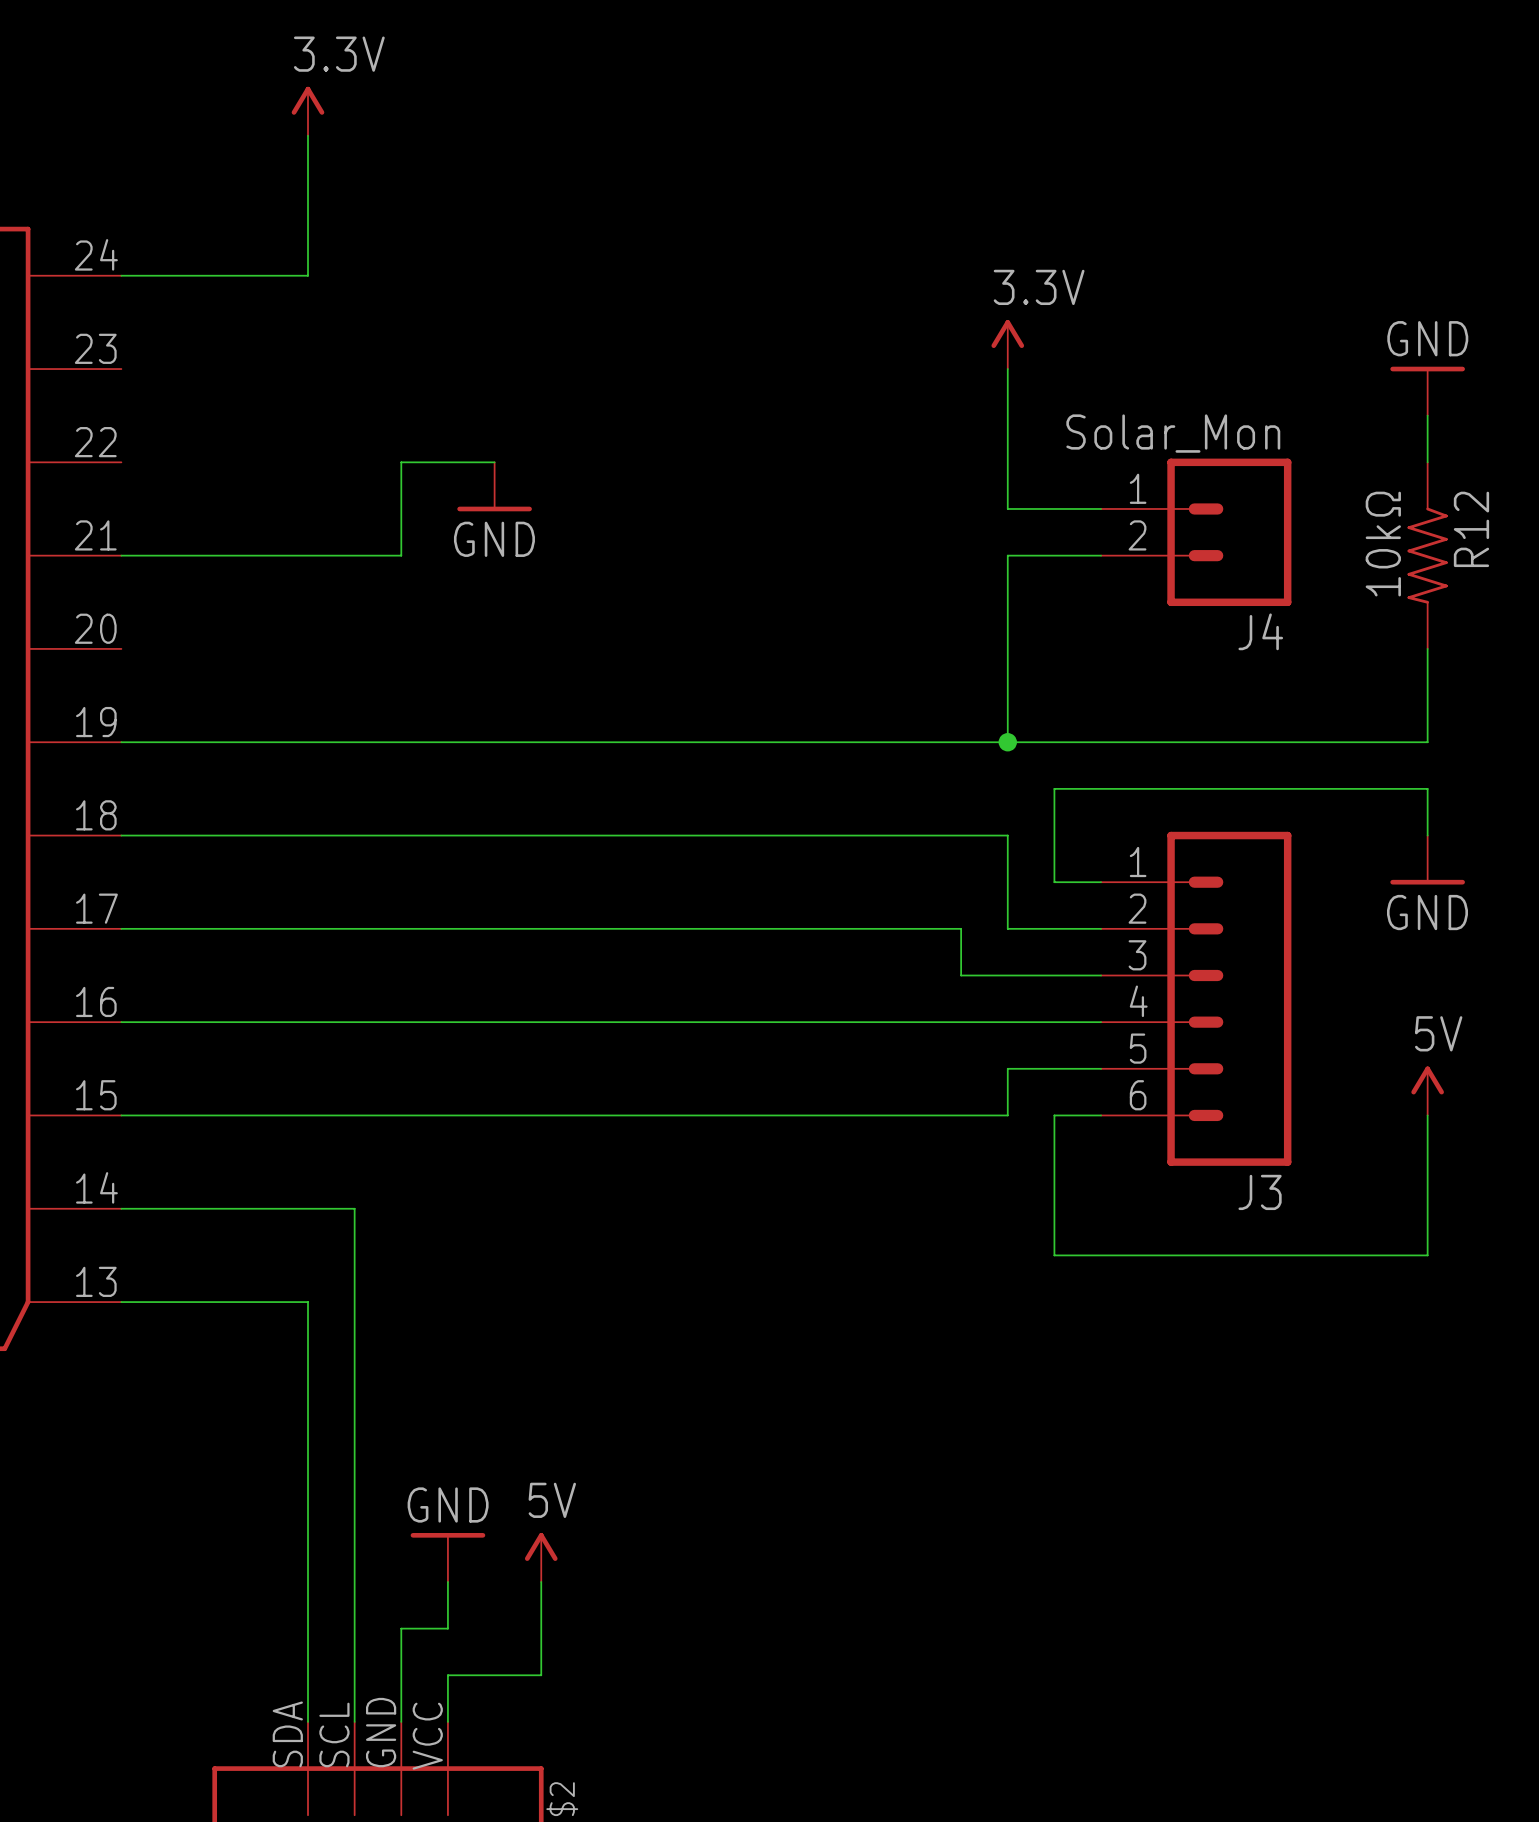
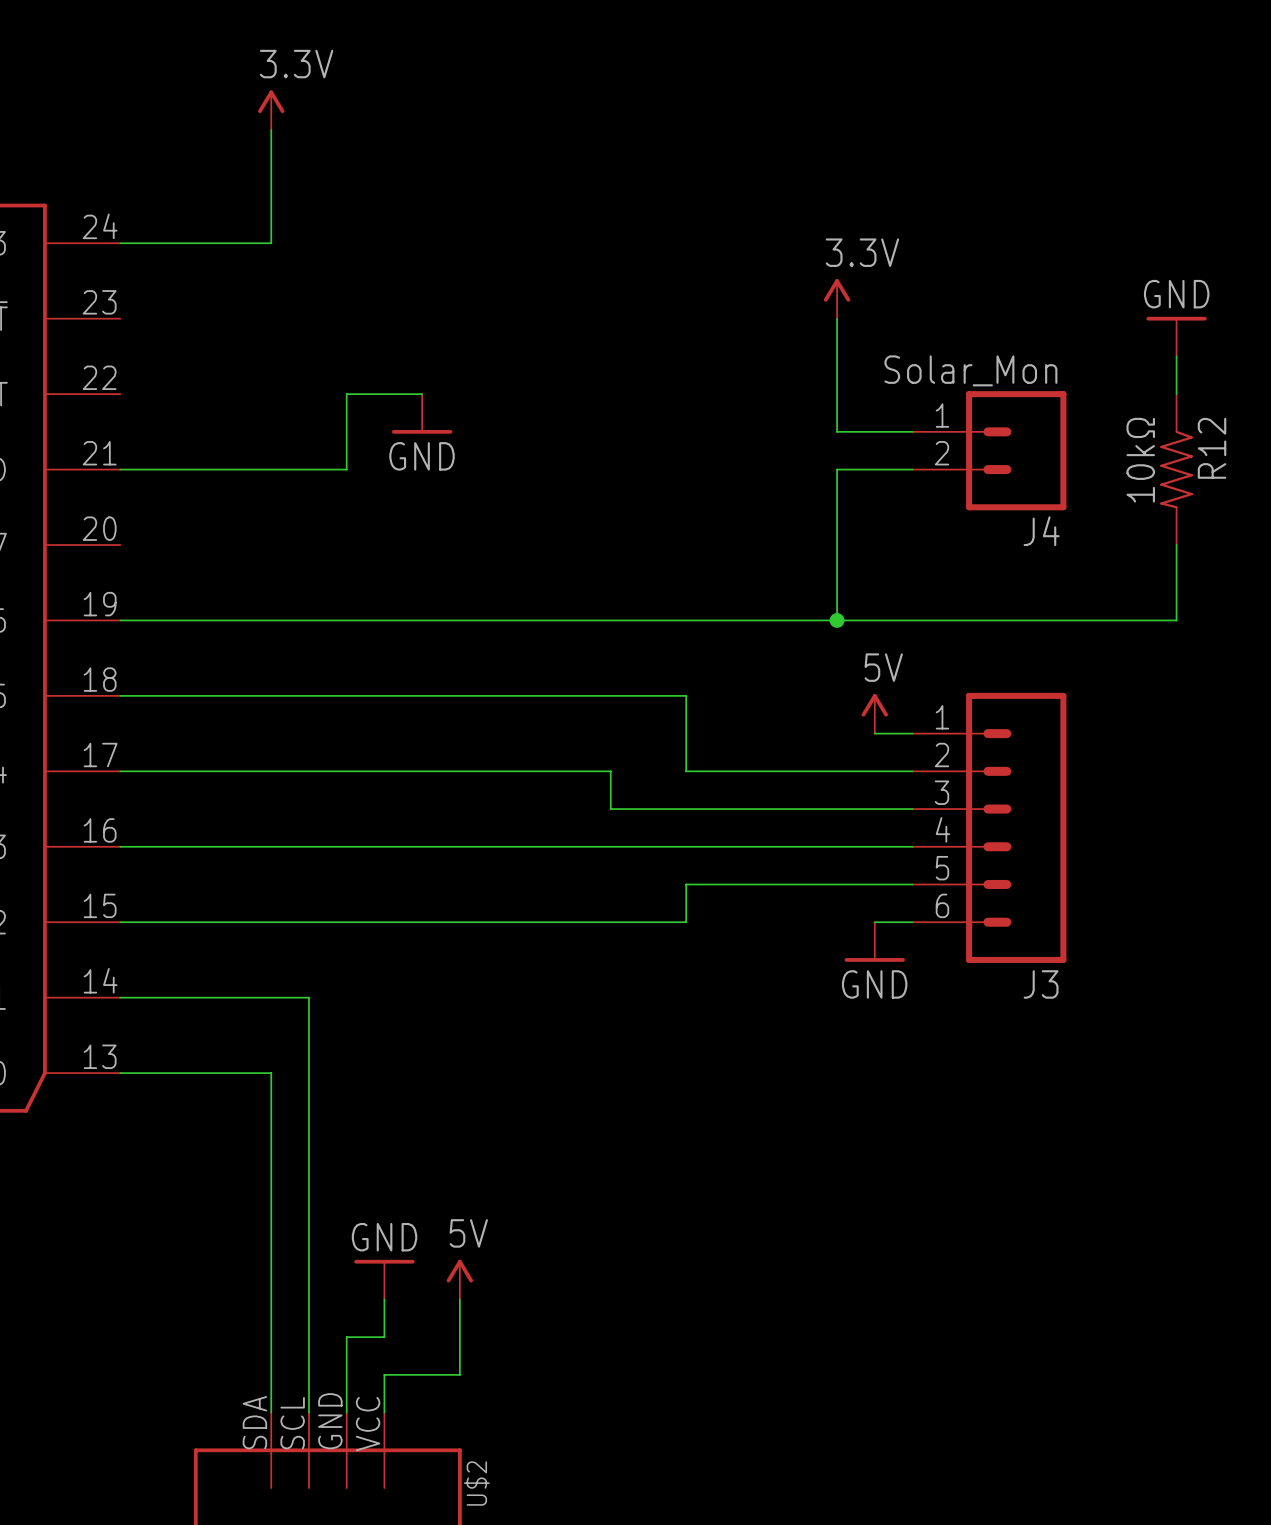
wire: (821, 835) (1007, 835) (1007, 928) -> none
wire: (1427, 835) (1427, 788) (1054, 788) (1054, 882) -> none
power symbol: GND (1427, 860) -> none
wire: (727, 928) (821, 928) -> (686, 695) (686, 771)
wire: none -> (610, 771) (610, 809) (799, 809)
wire: (961, 928) (961, 975) -> (799, 771) (837, 771)
wire: (1007, 1068) (1007, 1115) (821, 1115) -> (837, 884) (686, 884) (686, 922)
power symbol position: 5V (1427, 1090) -> 5V (874, 713)
wire: (1054, 1115) (1054, 1255) (1427, 1255) (1427, 1115) -> none
power symbol: none -> GND (874, 942)

